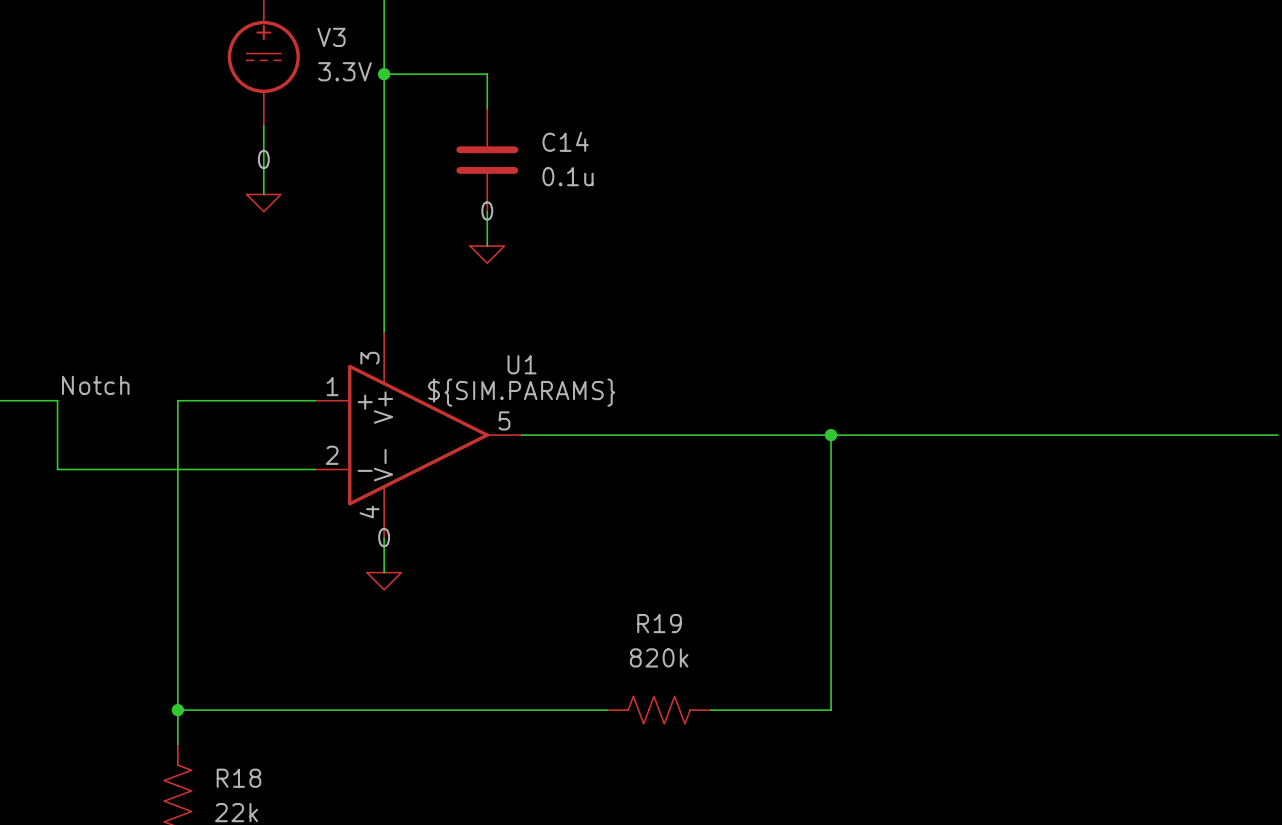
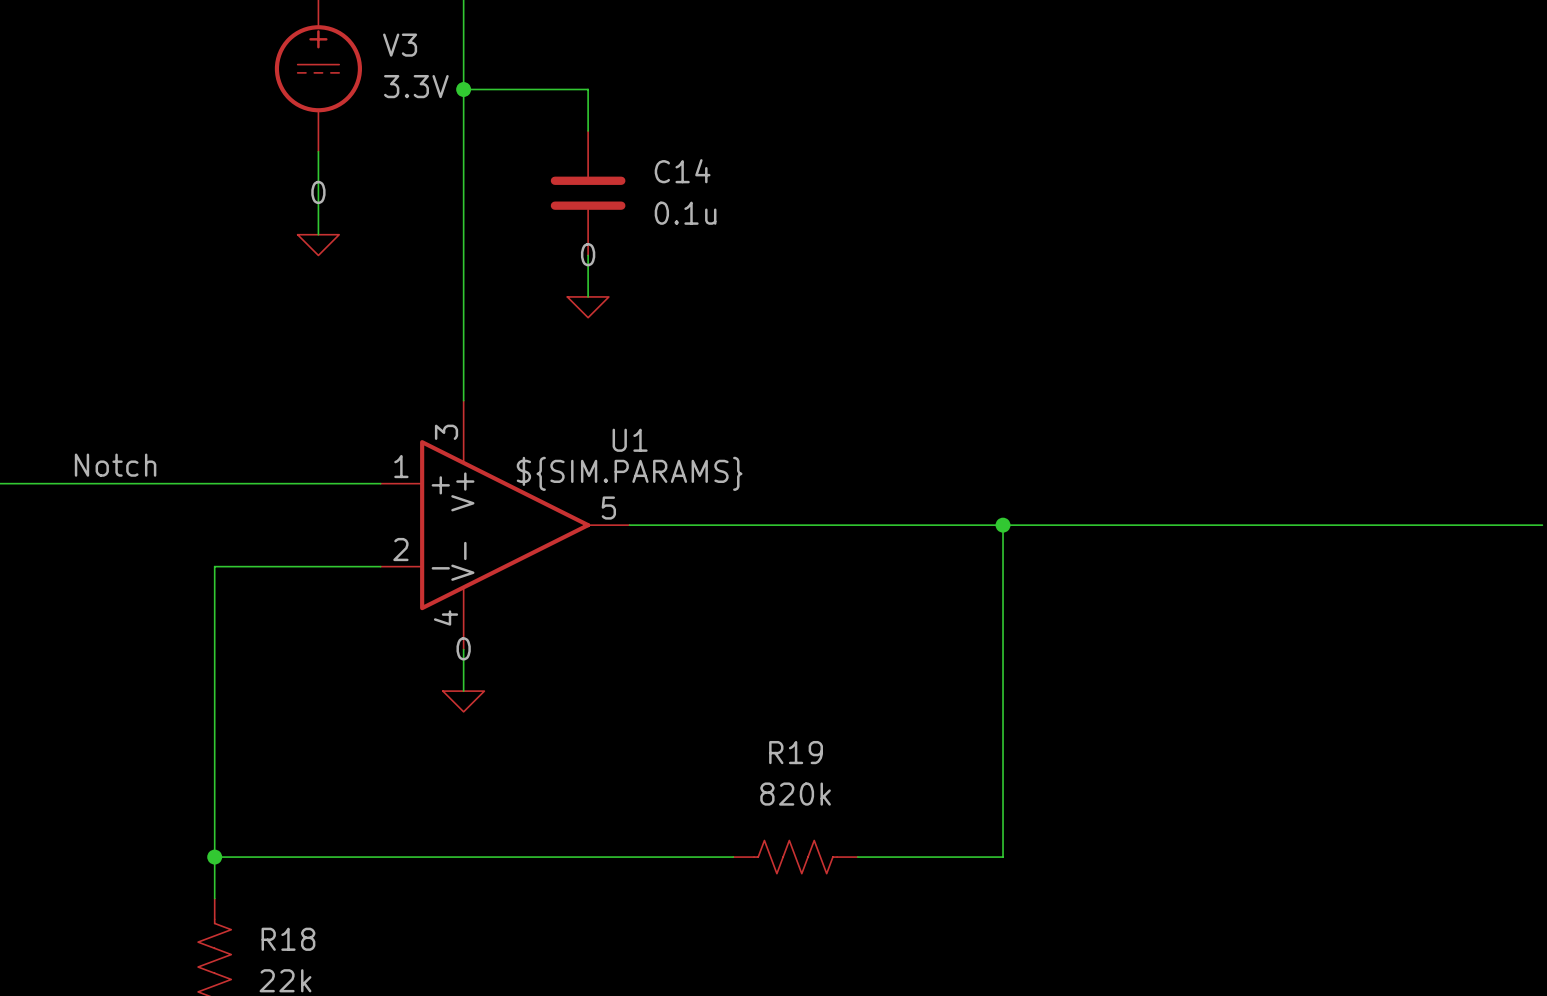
wire: (57, 400) (57, 469) (177, 469) (177, 400) -> (69, 483) (214, 483)

